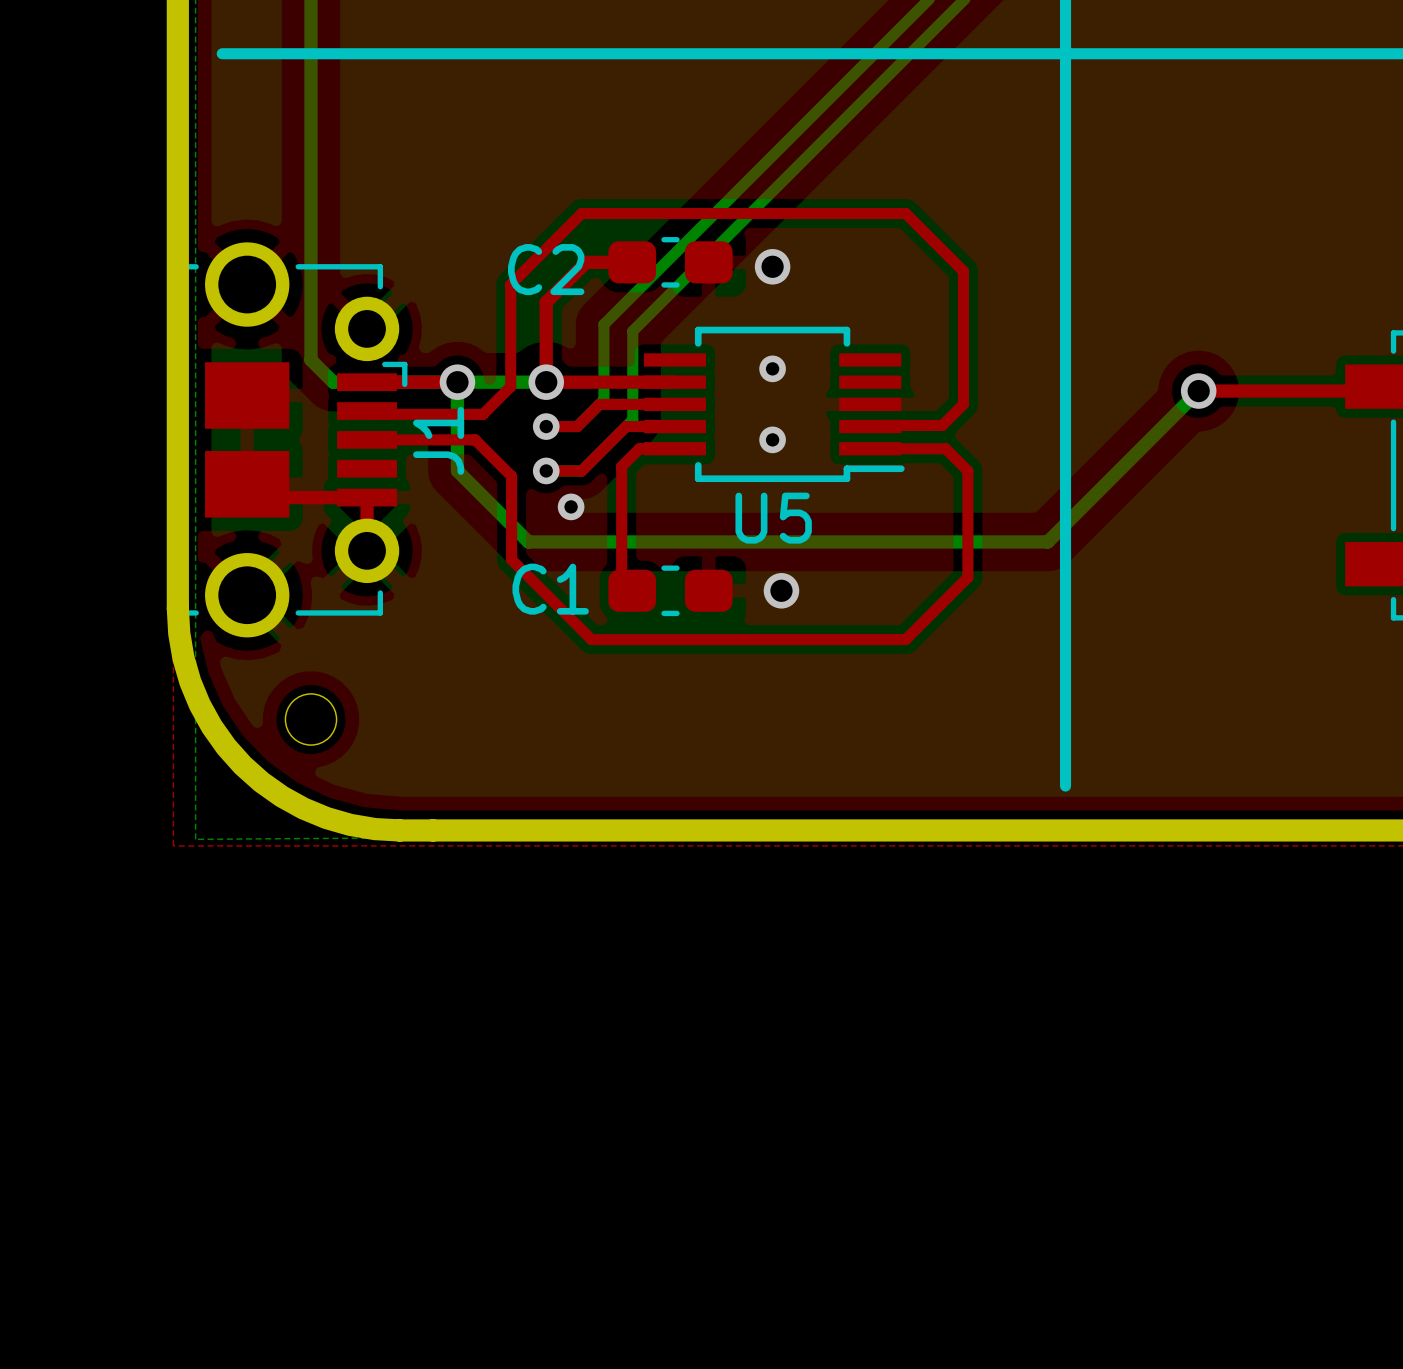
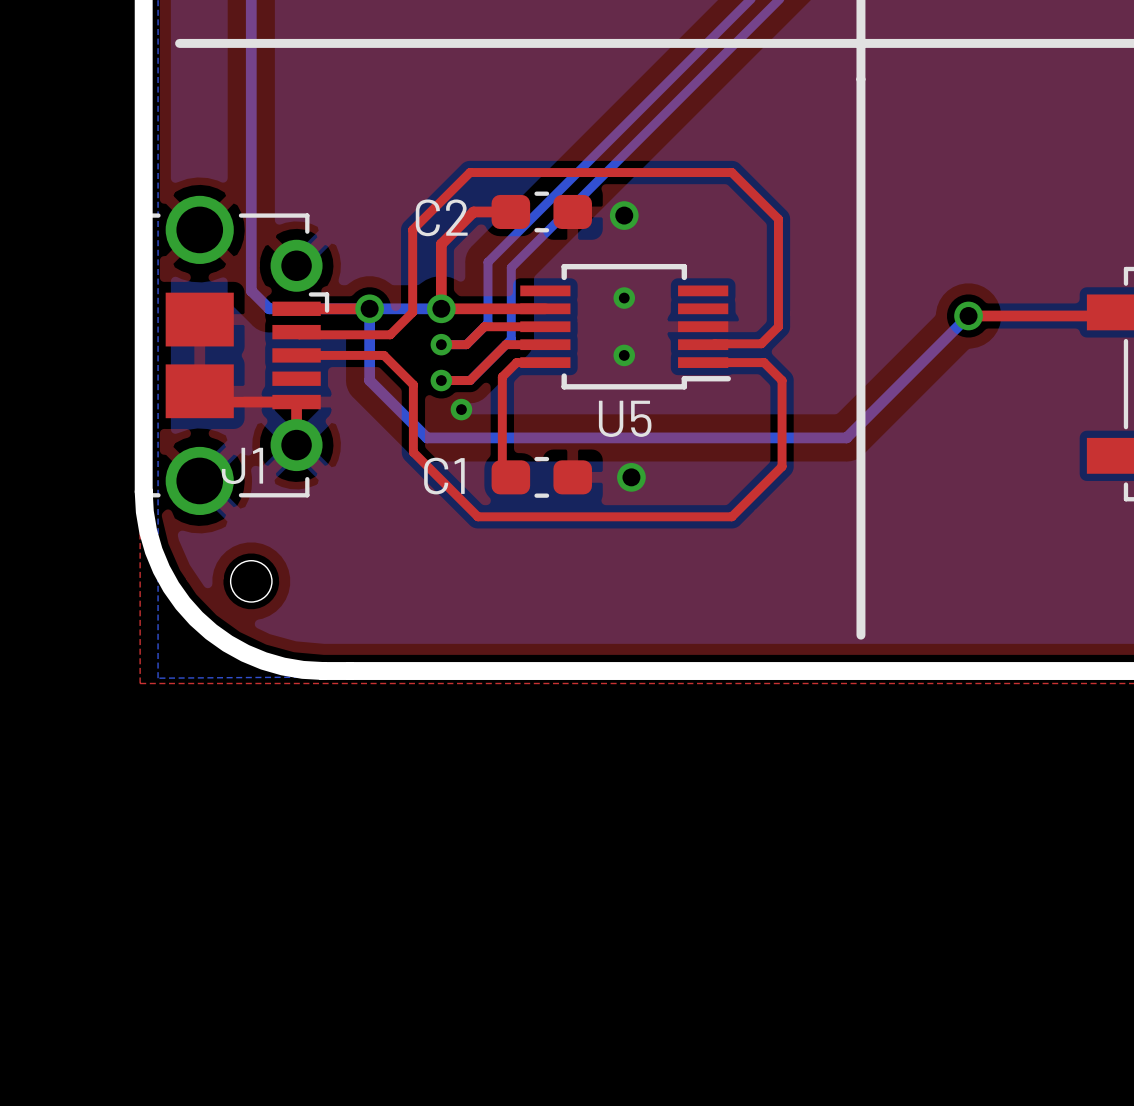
J1 name rotation: 0° (438, 440) -> 90° clockwise (242, 465)
J1 name position: J1 (438, 440) -> J1 (242, 465)

